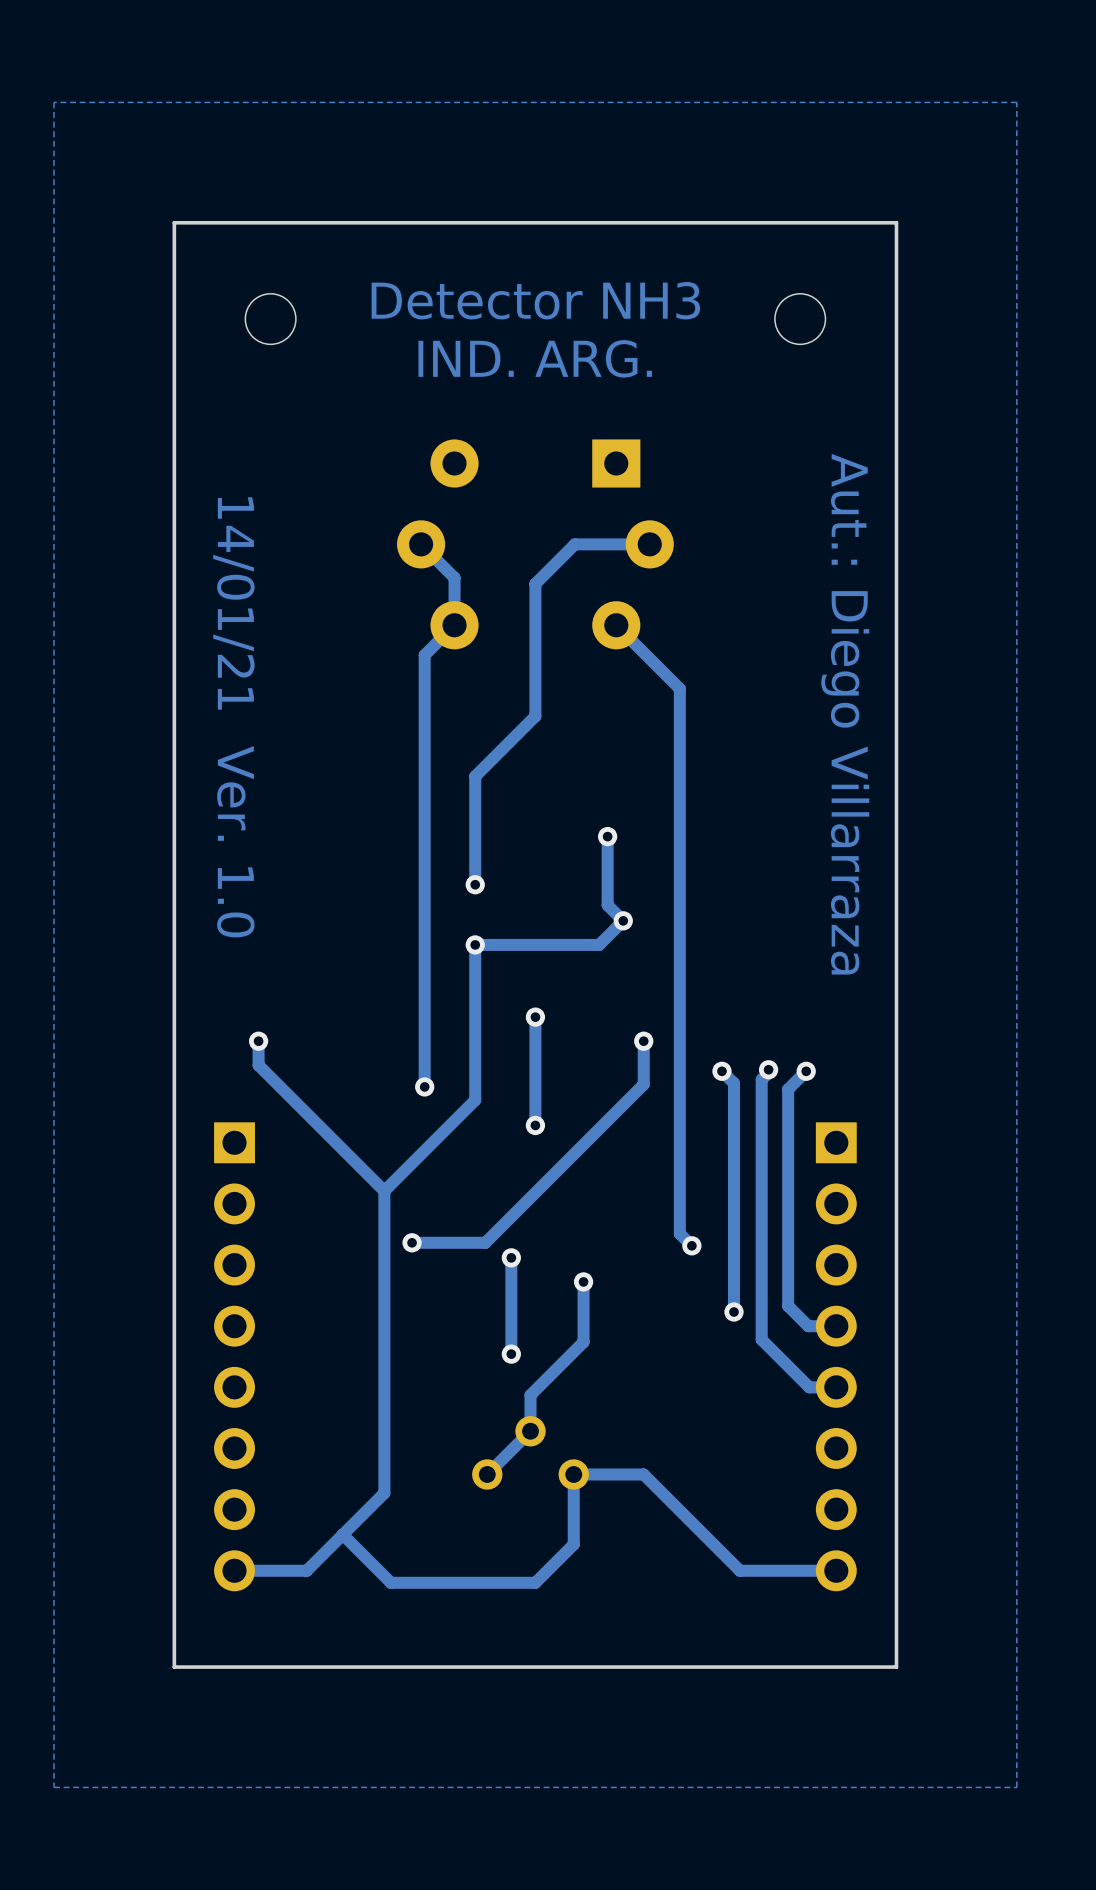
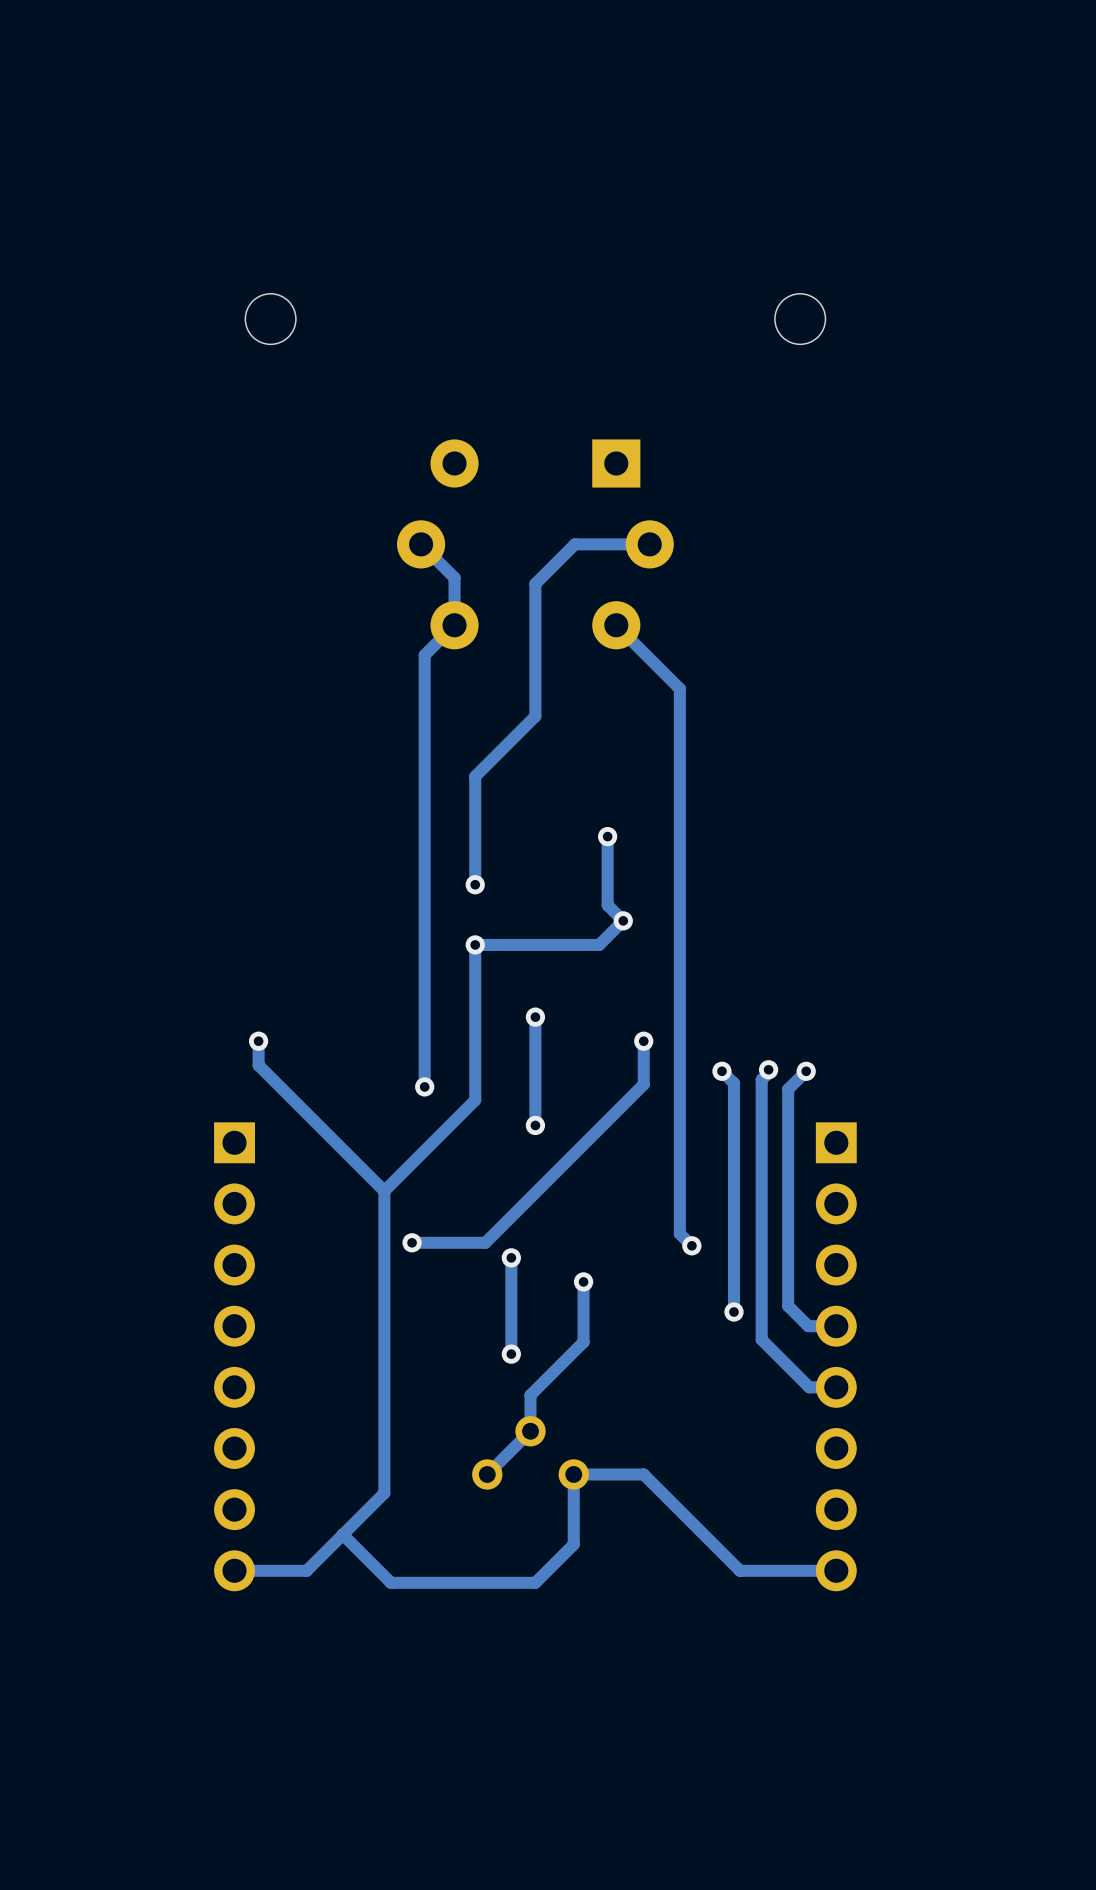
zone outline: (1016, 102) (1016, 1787) (53, 1787) (53, 102) (1016, 102) -> none
board edge: (896, 222) (174, 222) (174, 1667) (896, 1667) (896, 222) -> none
text: Detector NH3 (535, 300) -> none
text: IND. ARG. (535, 358) -> none
text: Aut.: Diego Villarraza (845, 714) -> none
text: 14/01/21 Ver. 1.0 (233, 717) -> none

